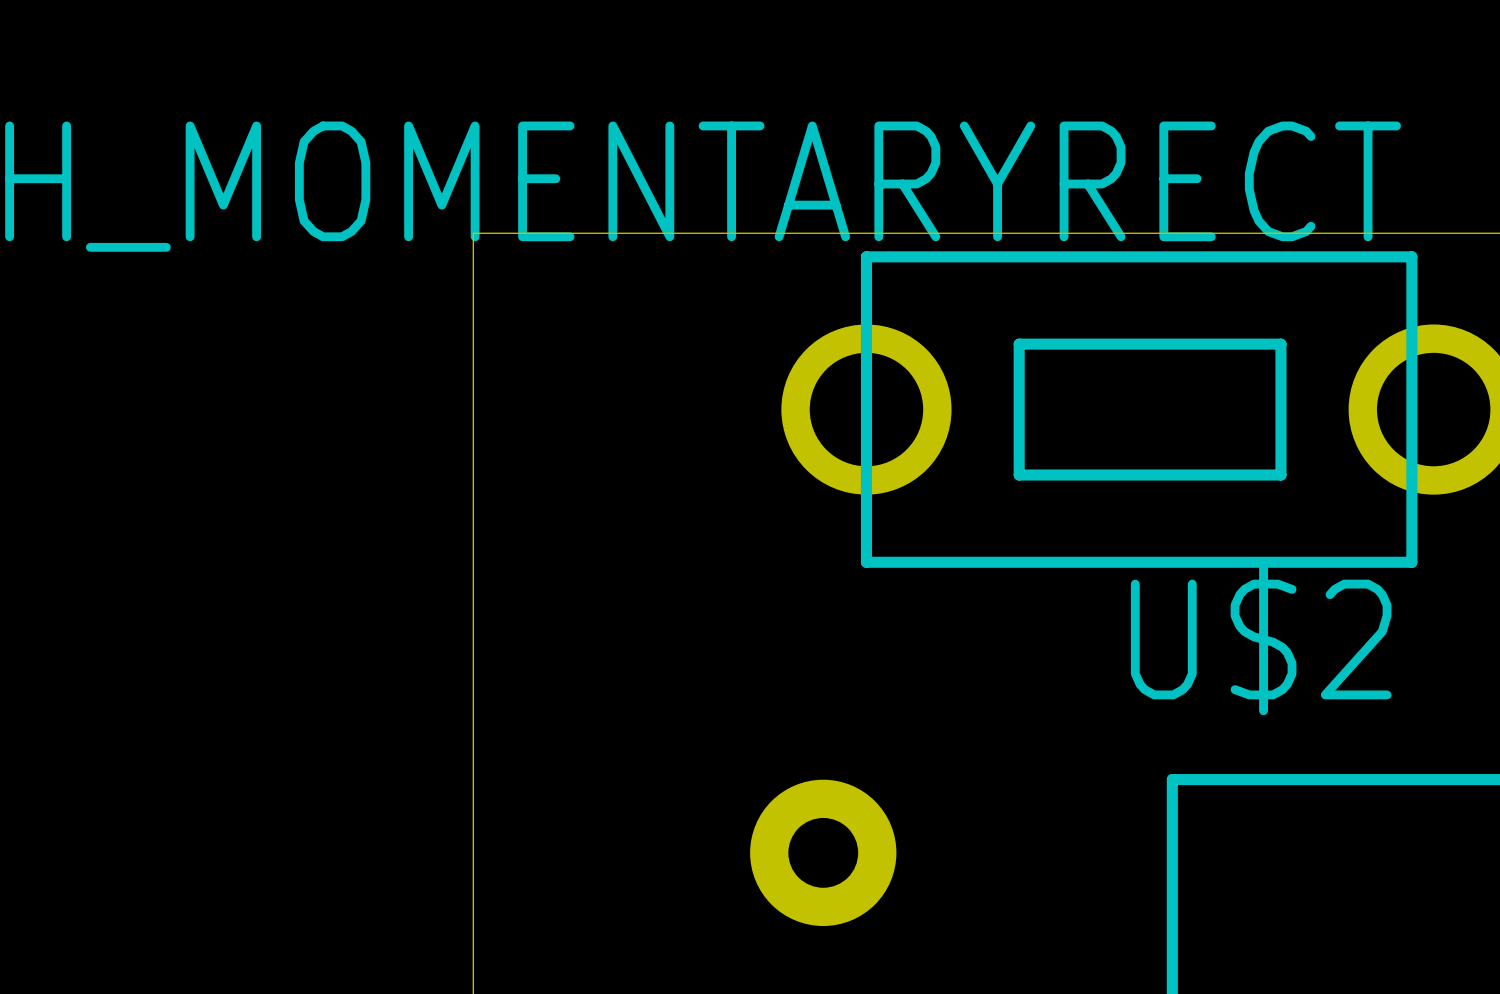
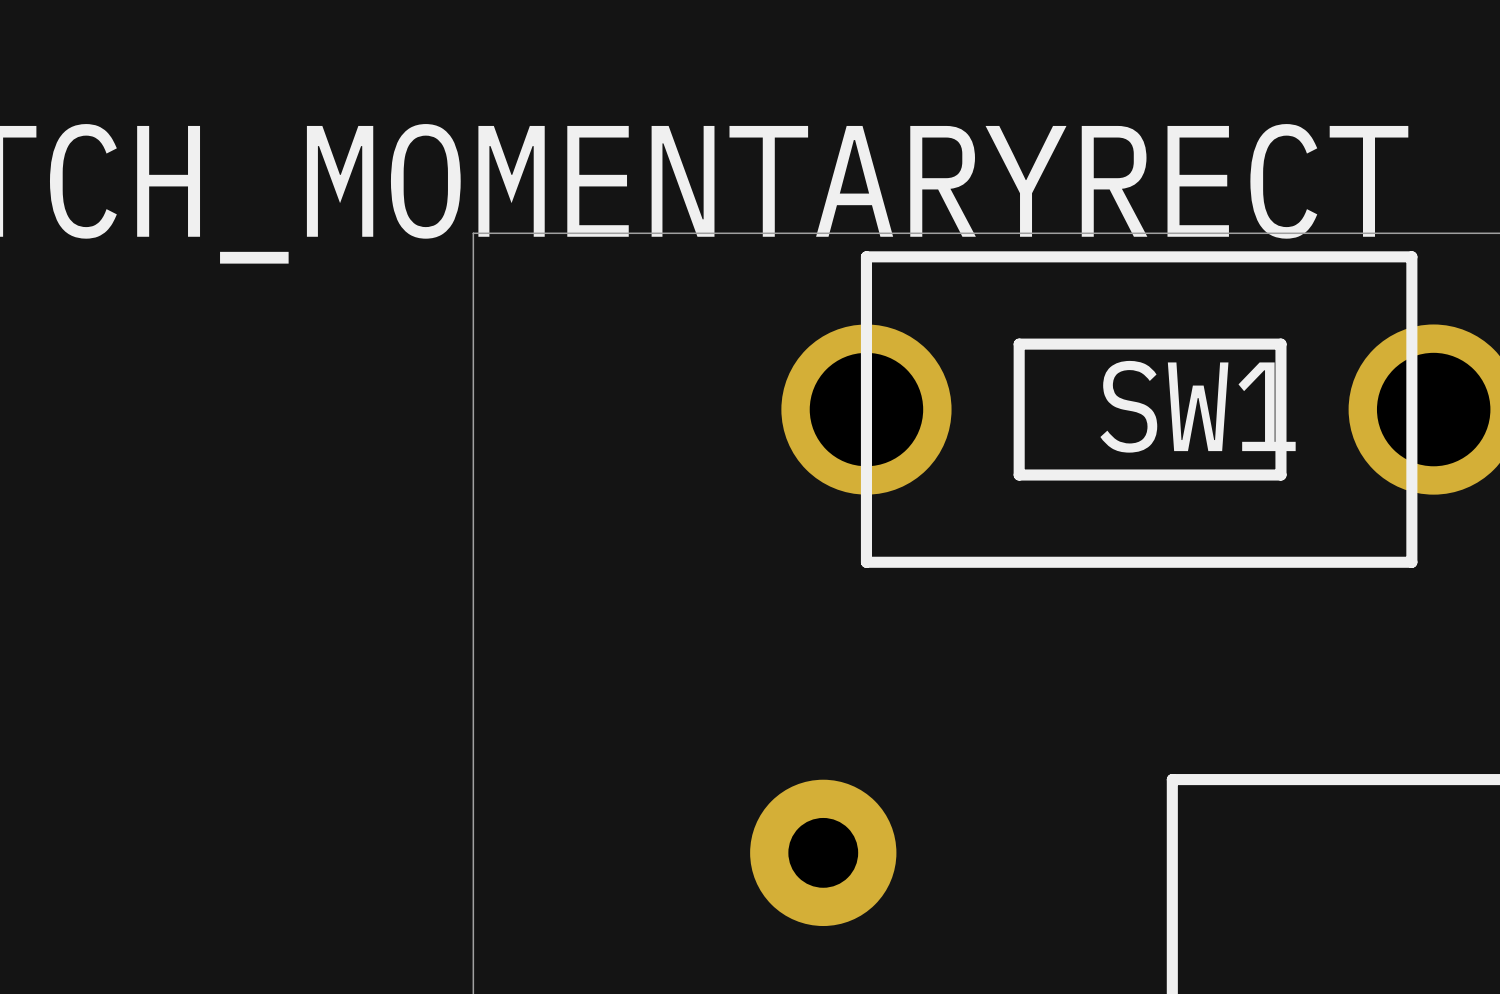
U$2 name: U$2 (1261, 639) -> SW1 (1198, 406)

